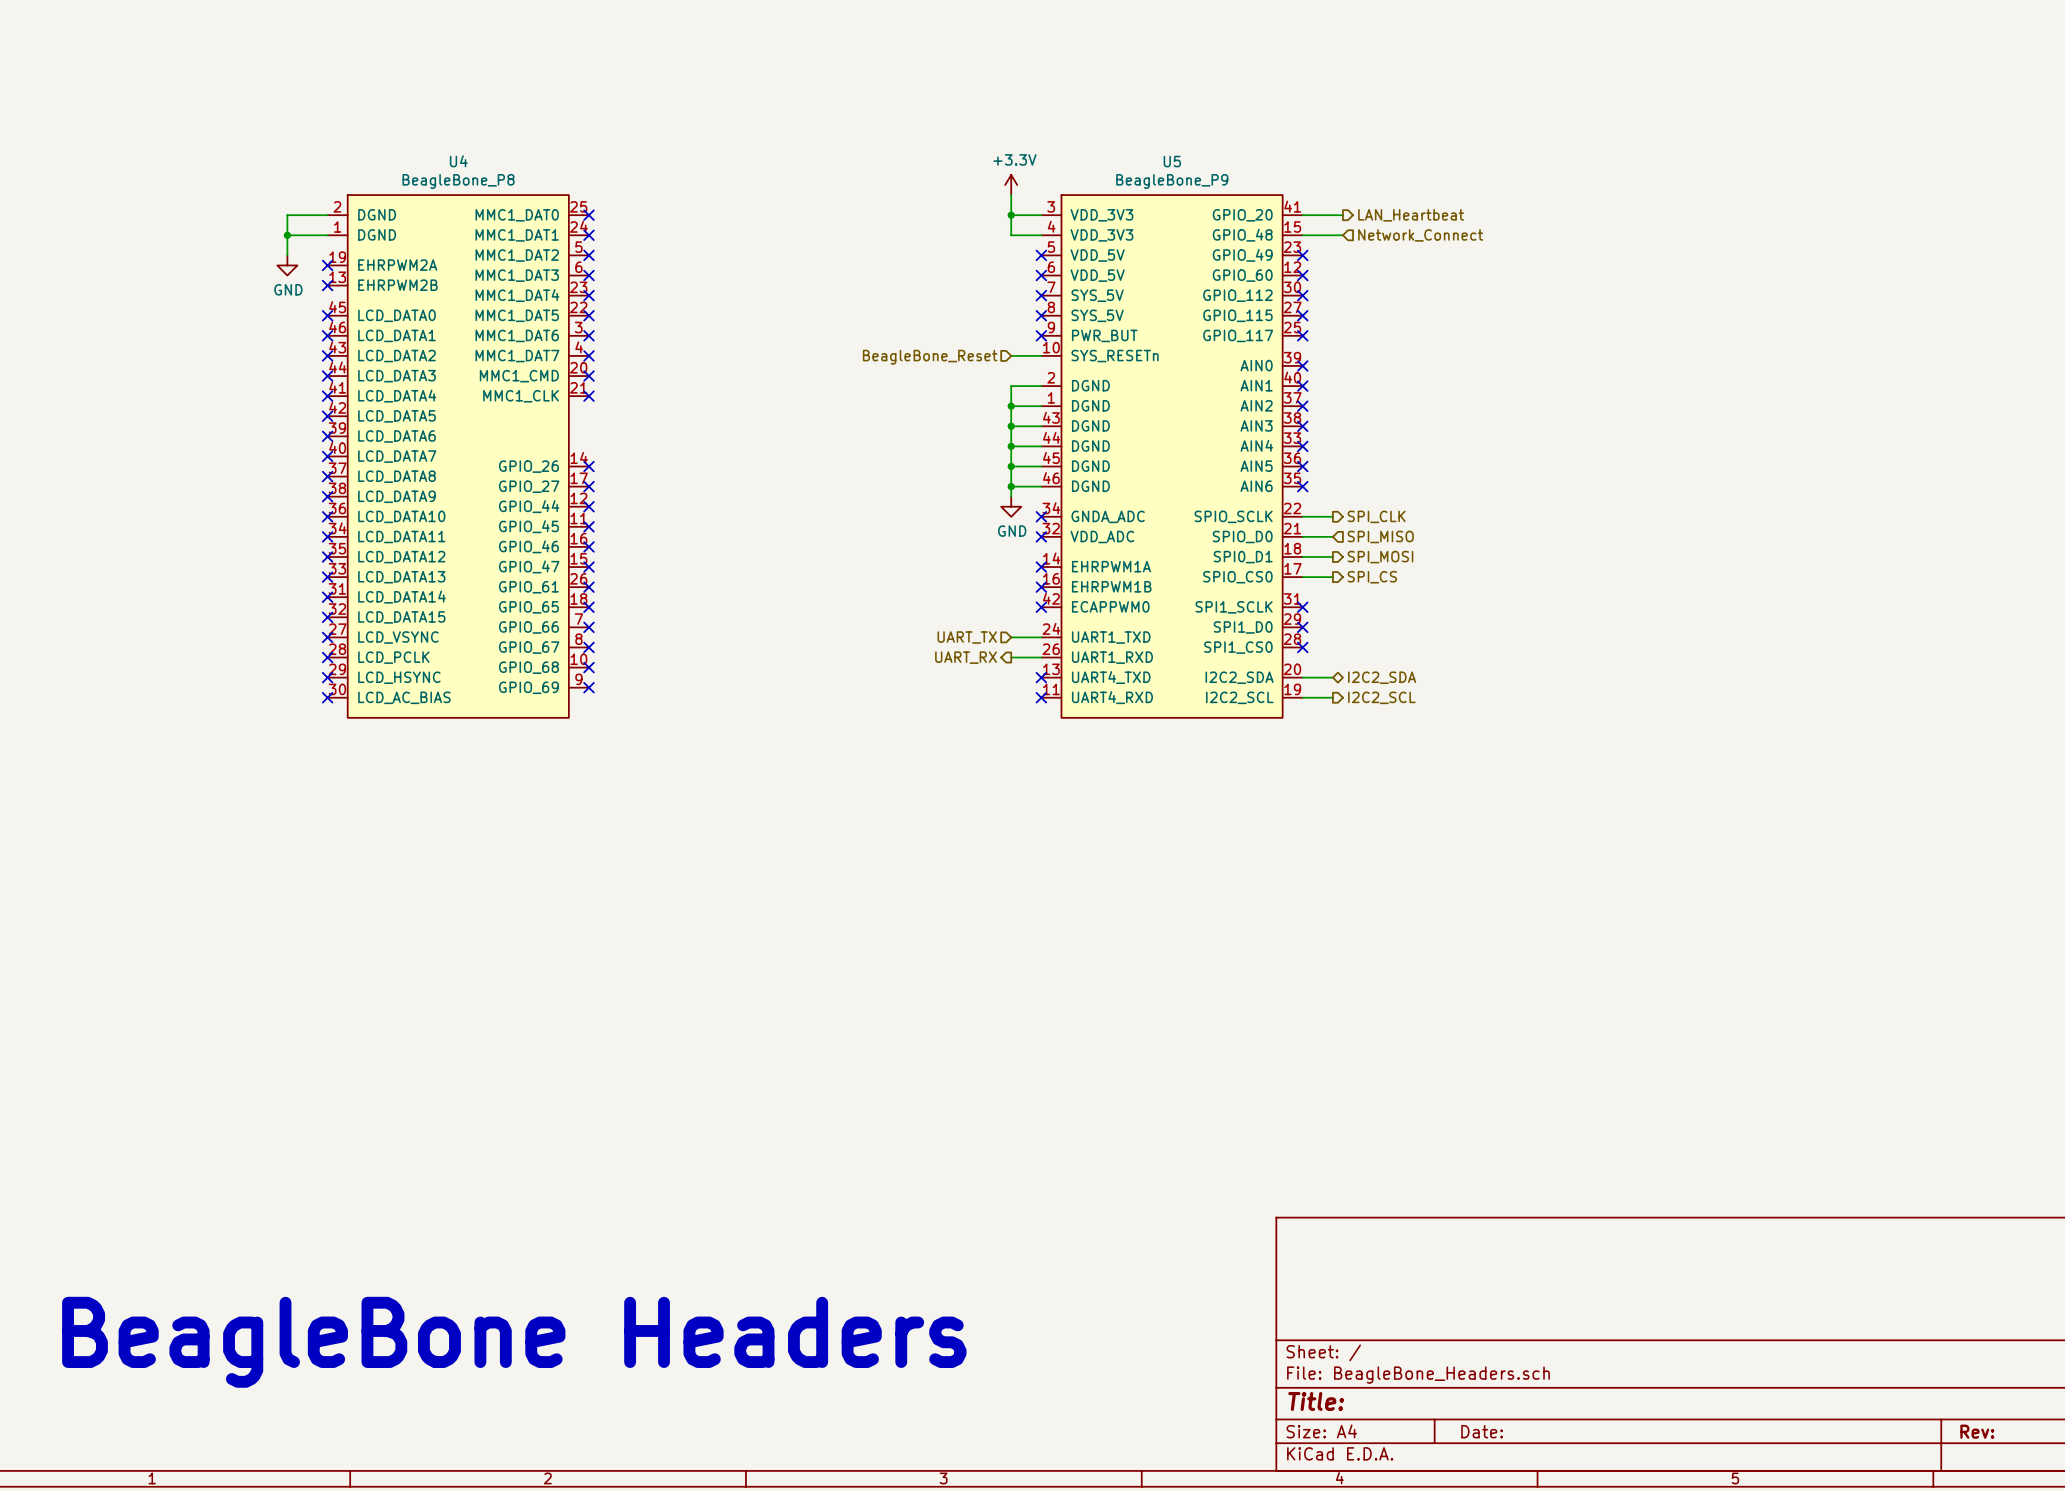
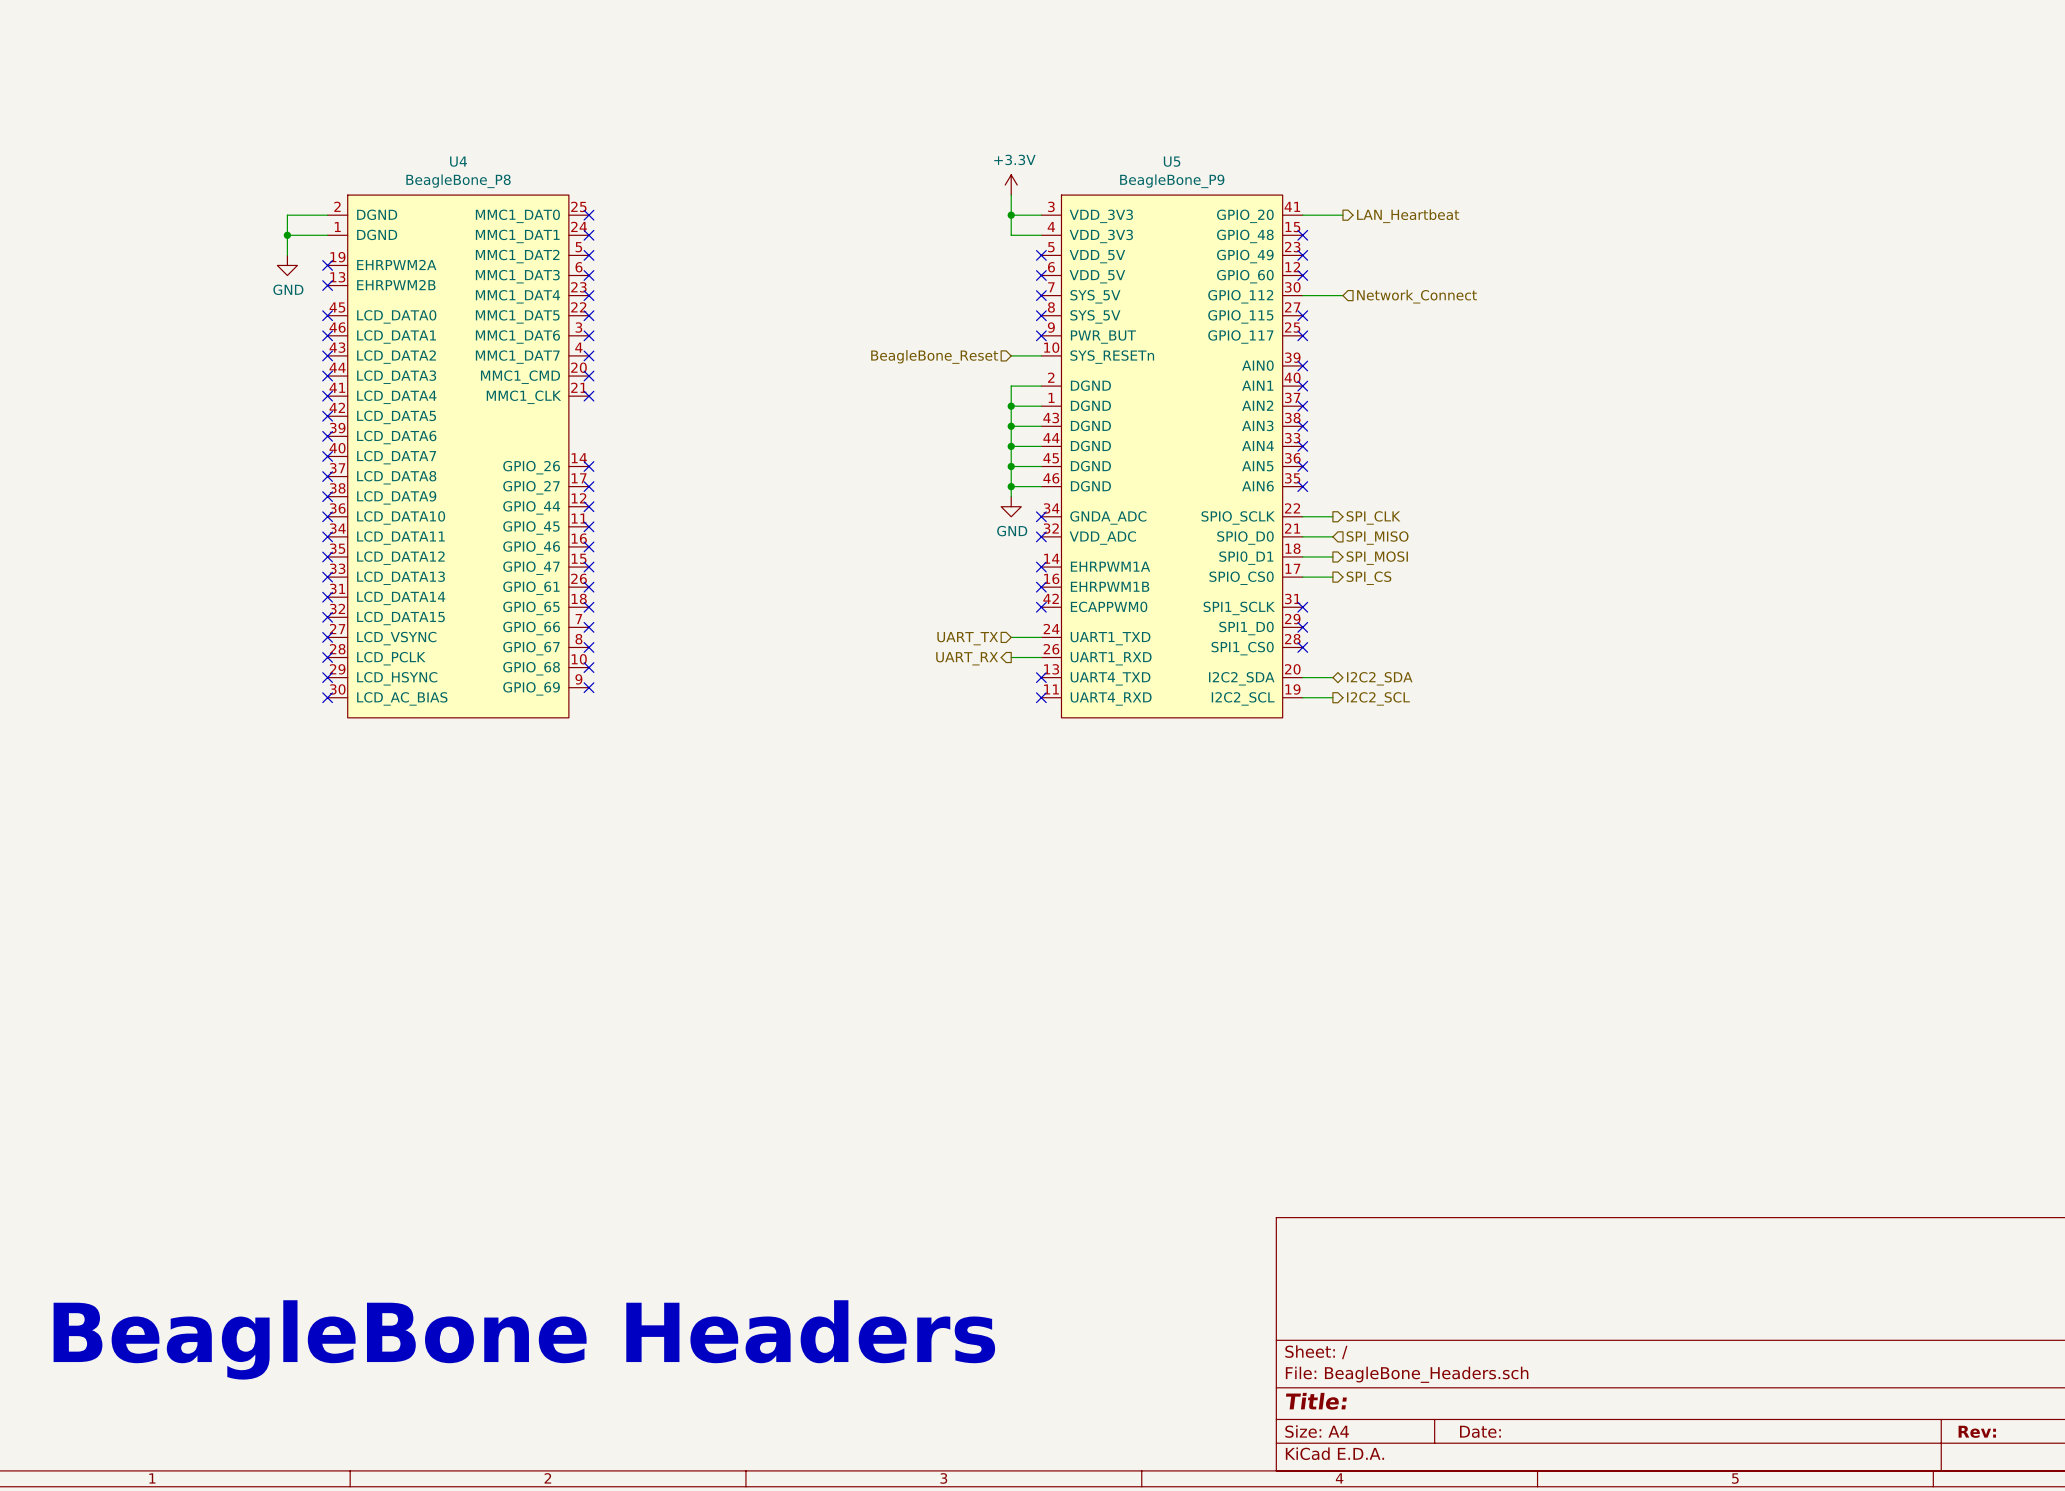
wire: (1302, 235) (1342, 235) -> (1302, 295) (1342, 295)
no-connect mark: none -> (1302, 235)
hierarchical label position: Network_Connect (1420, 235) -> Network_Connect (1416, 296)
no-connect mark: (1302, 295) -> none

